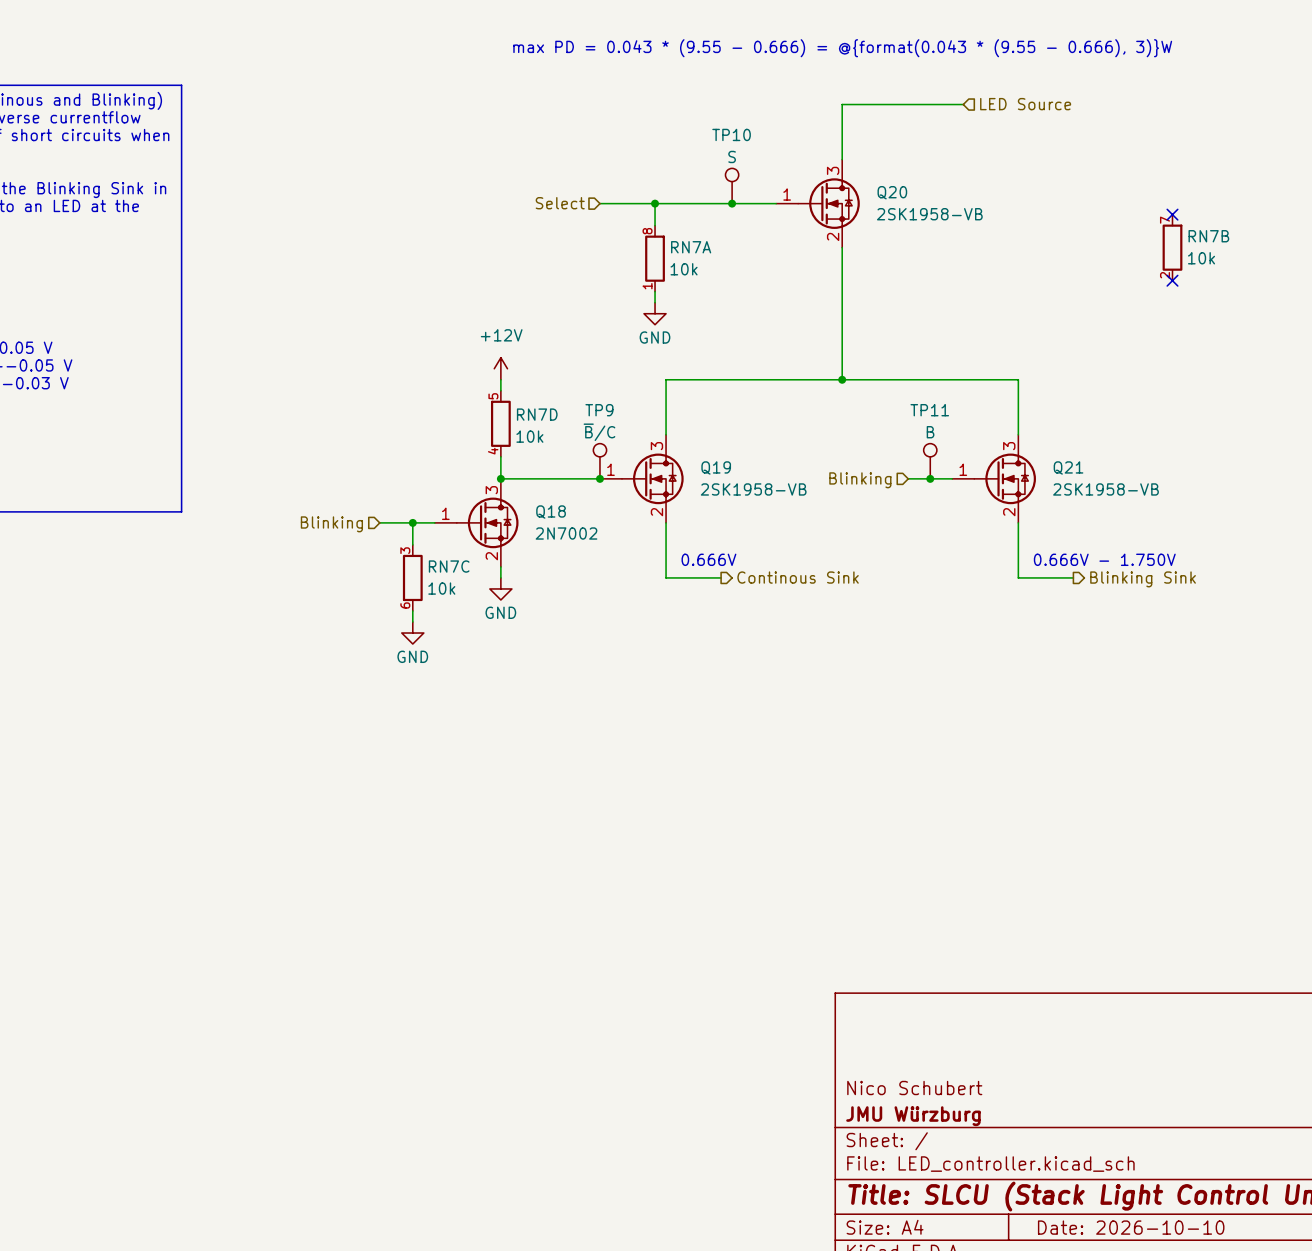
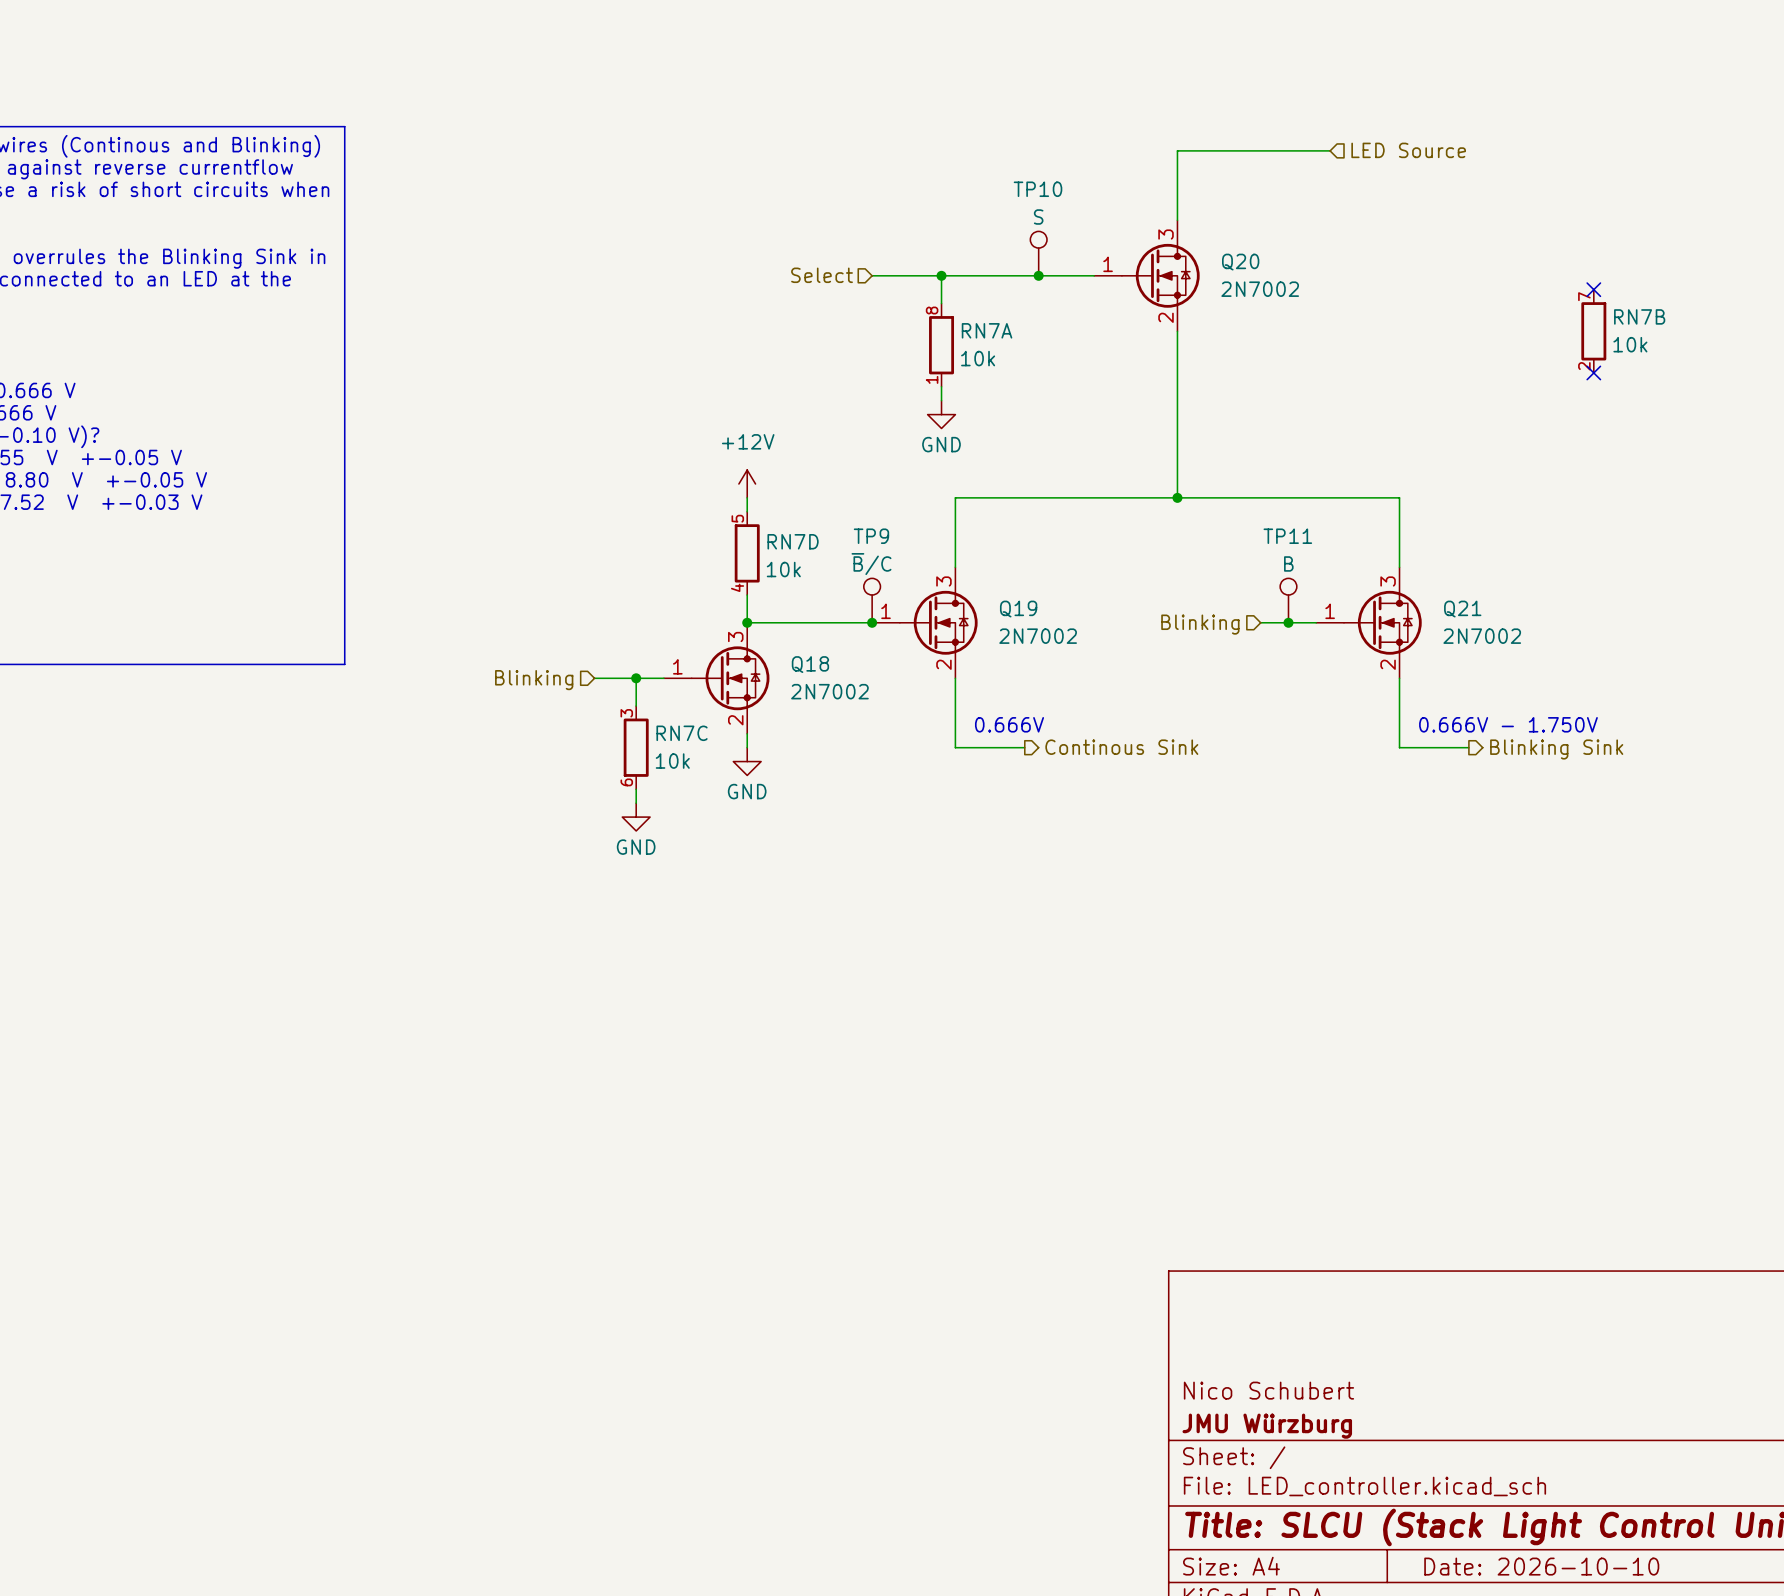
text: max PD = 0.043 * (9.55 - 0.666) = @{format(0.043 * (9.55 - 0.666), 3)}W (842, 48) -> none
Q20 value: 2SK1958-VB (929, 214) -> 2N7002 (1260, 289)
Q19 value: 2SK1958-VB (753, 489) -> 2N7002 (1038, 636)
Q21 value: 2SK1958-VB (1105, 489) -> 2N7002 (1482, 636)

